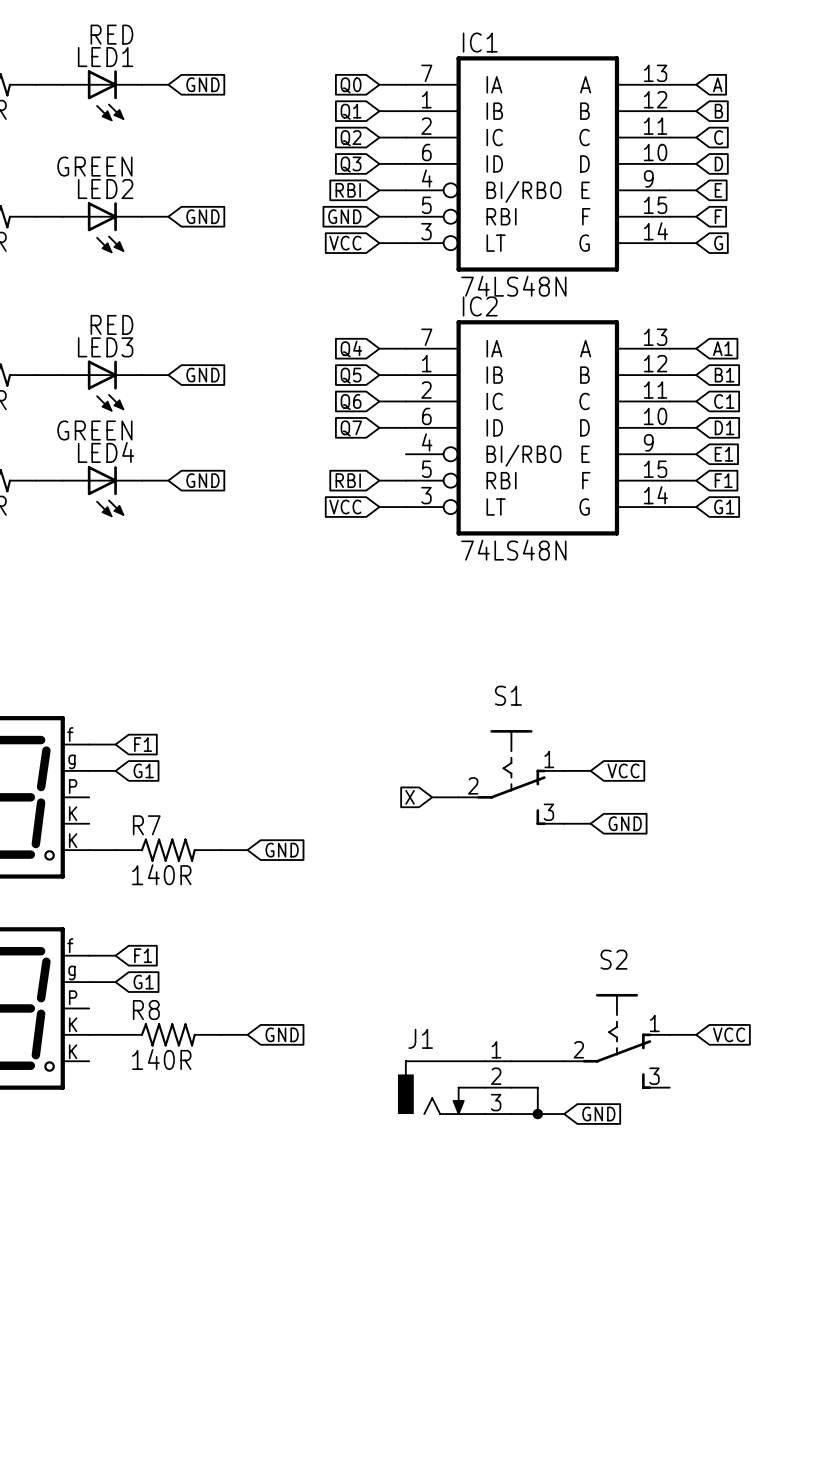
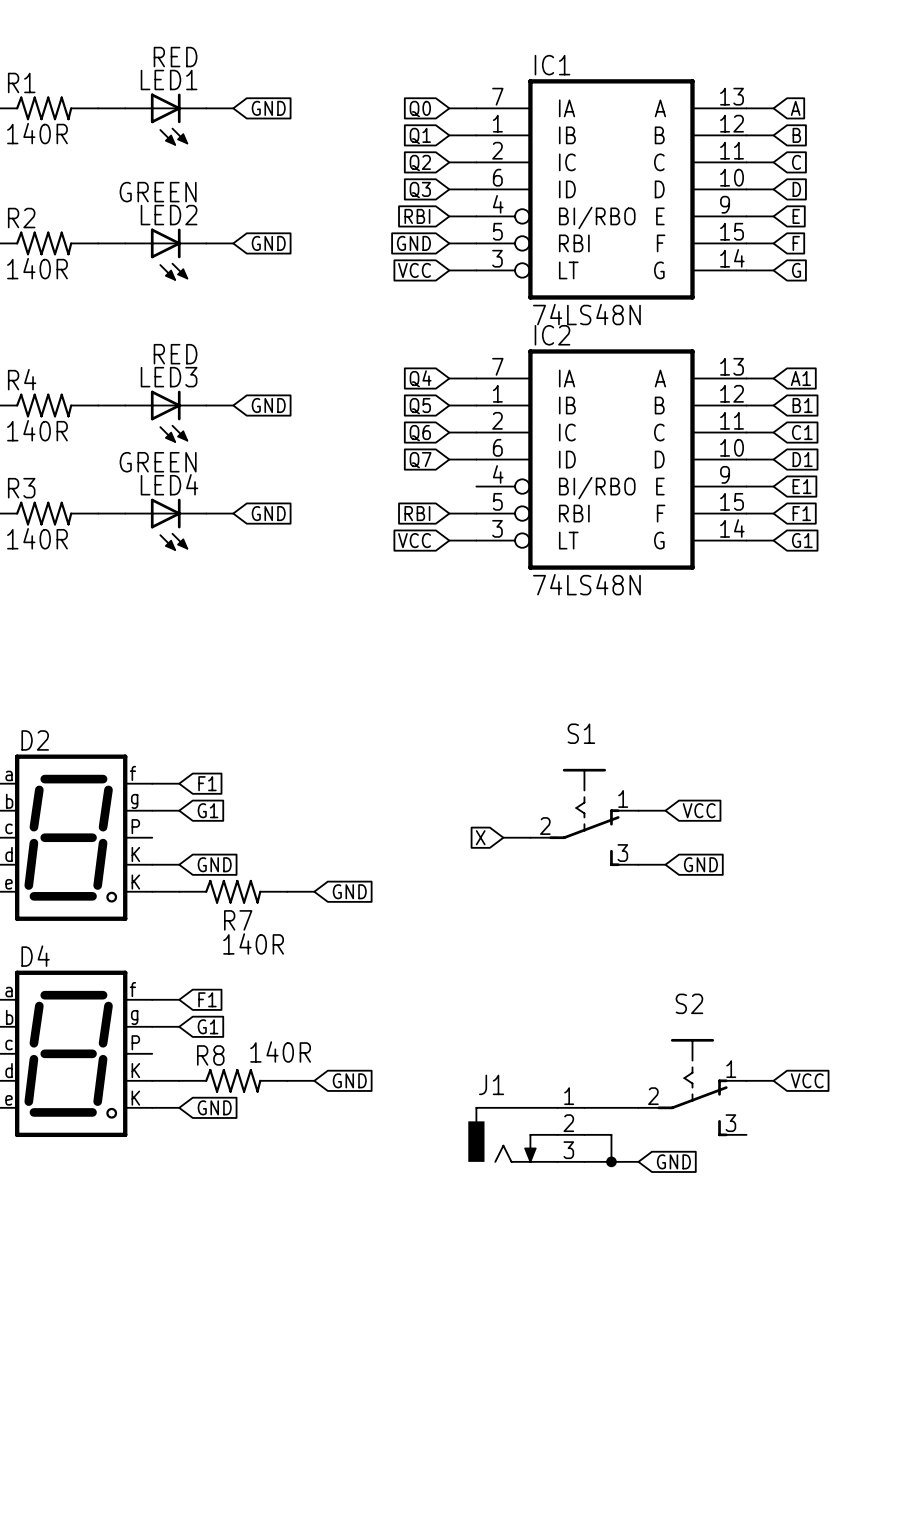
wire: none -> (152, 864) (179, 864)
global label: none -> GND (214, 864)
R7 name position: R7 (146, 825) -> R7 (238, 920)
R7 value position: 140R (161, 874) -> 140R (253, 943)
R8 value position: 140R (161, 1059) -> 140R (280, 1052)
wire: none -> (152, 1107) (179, 1107)
global label: none -> GND (214, 1107)

